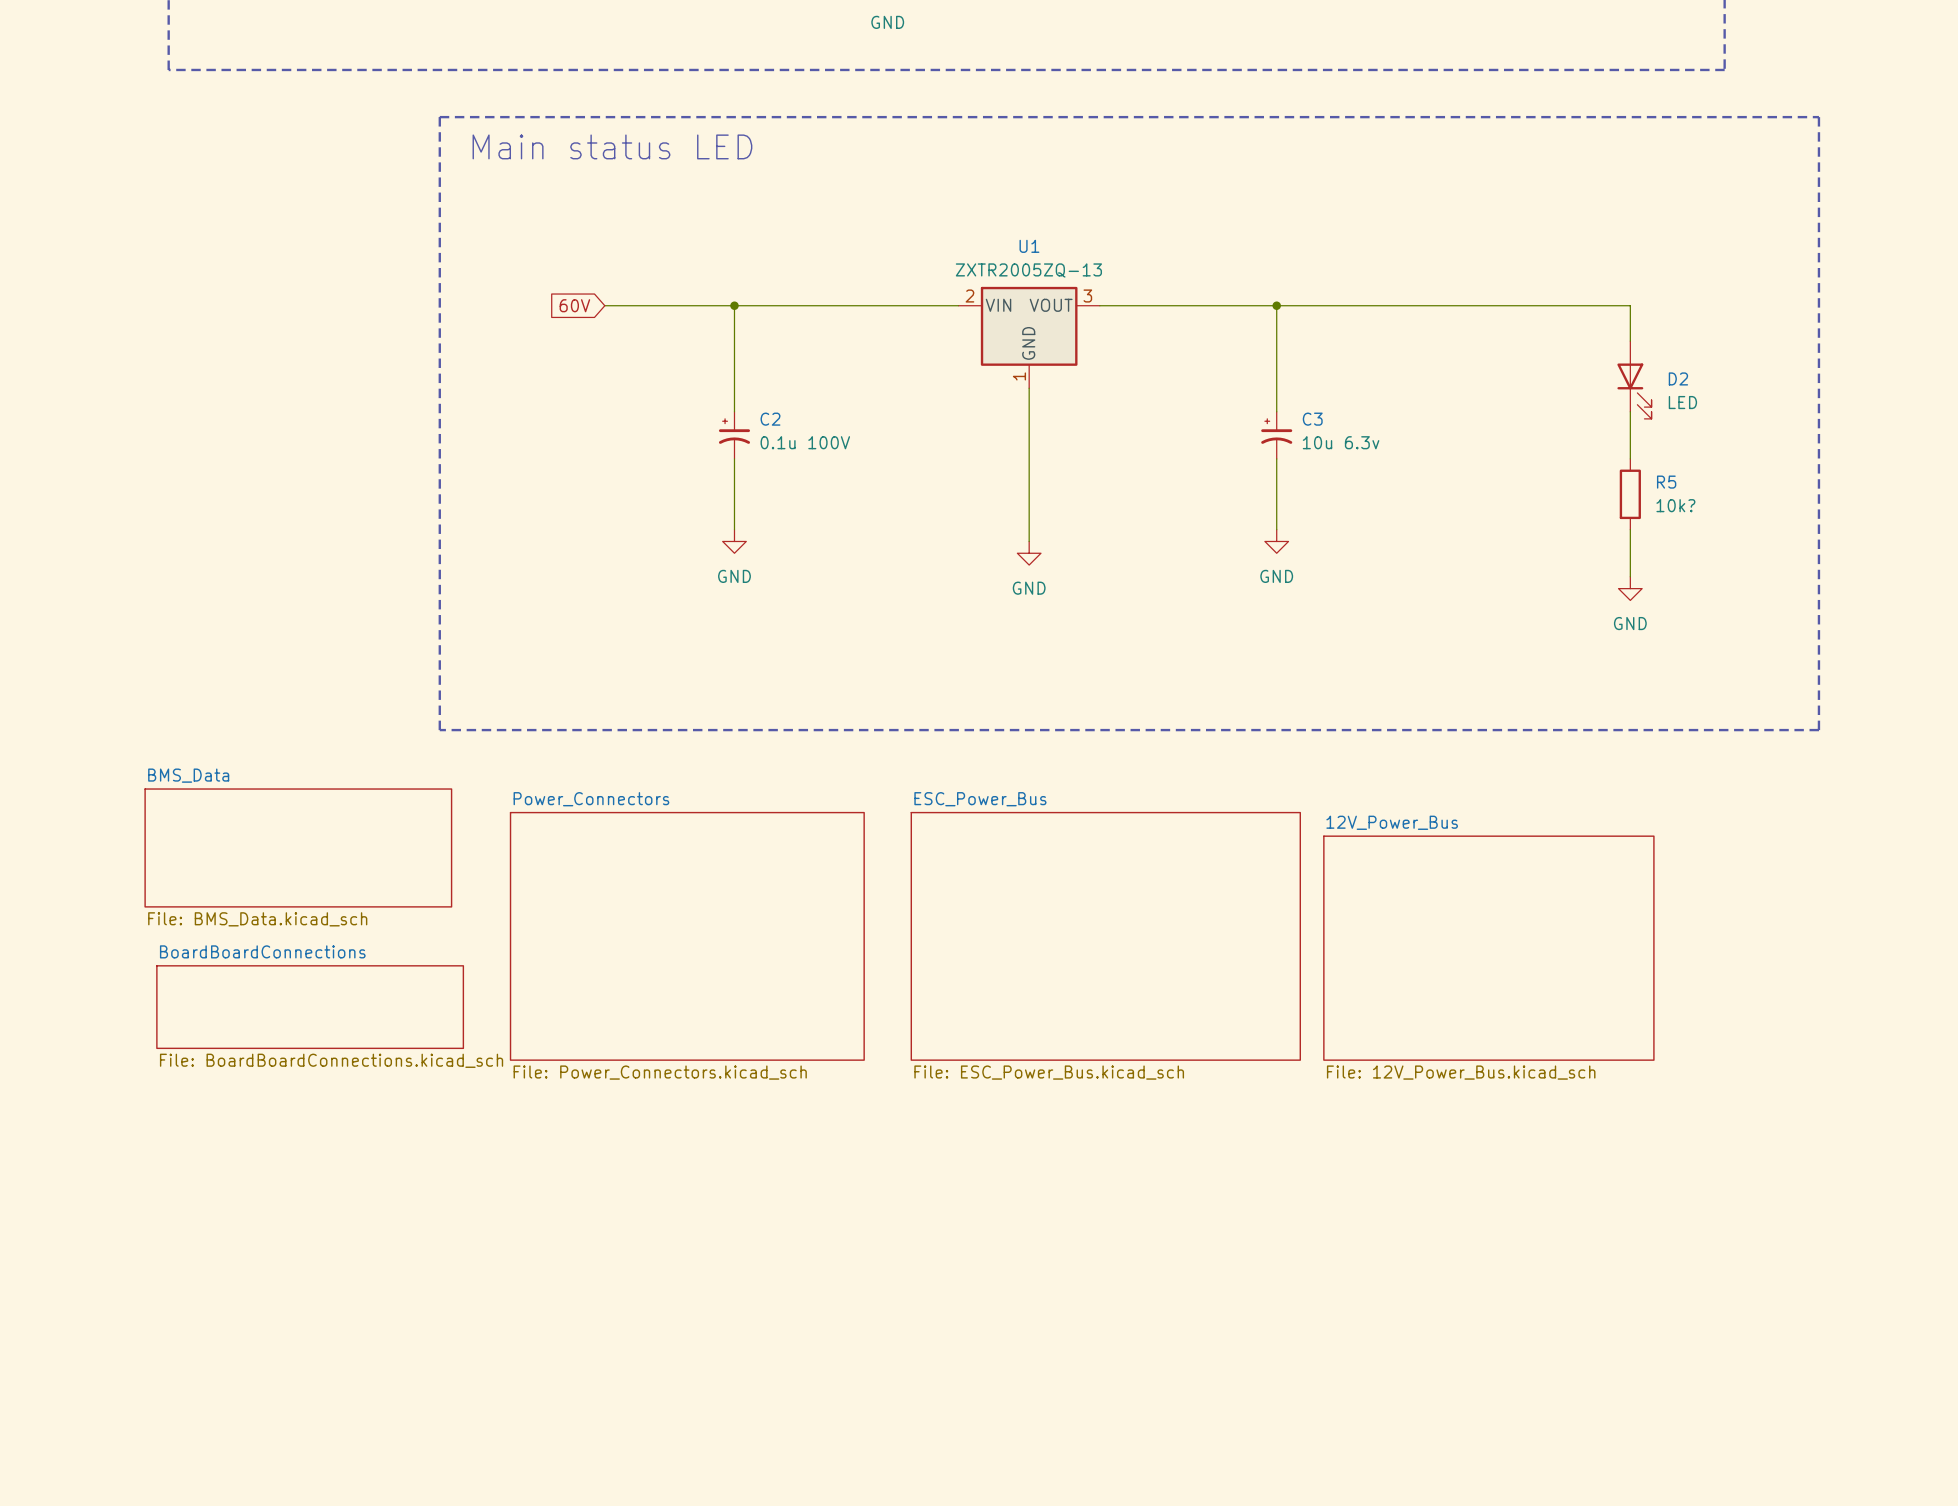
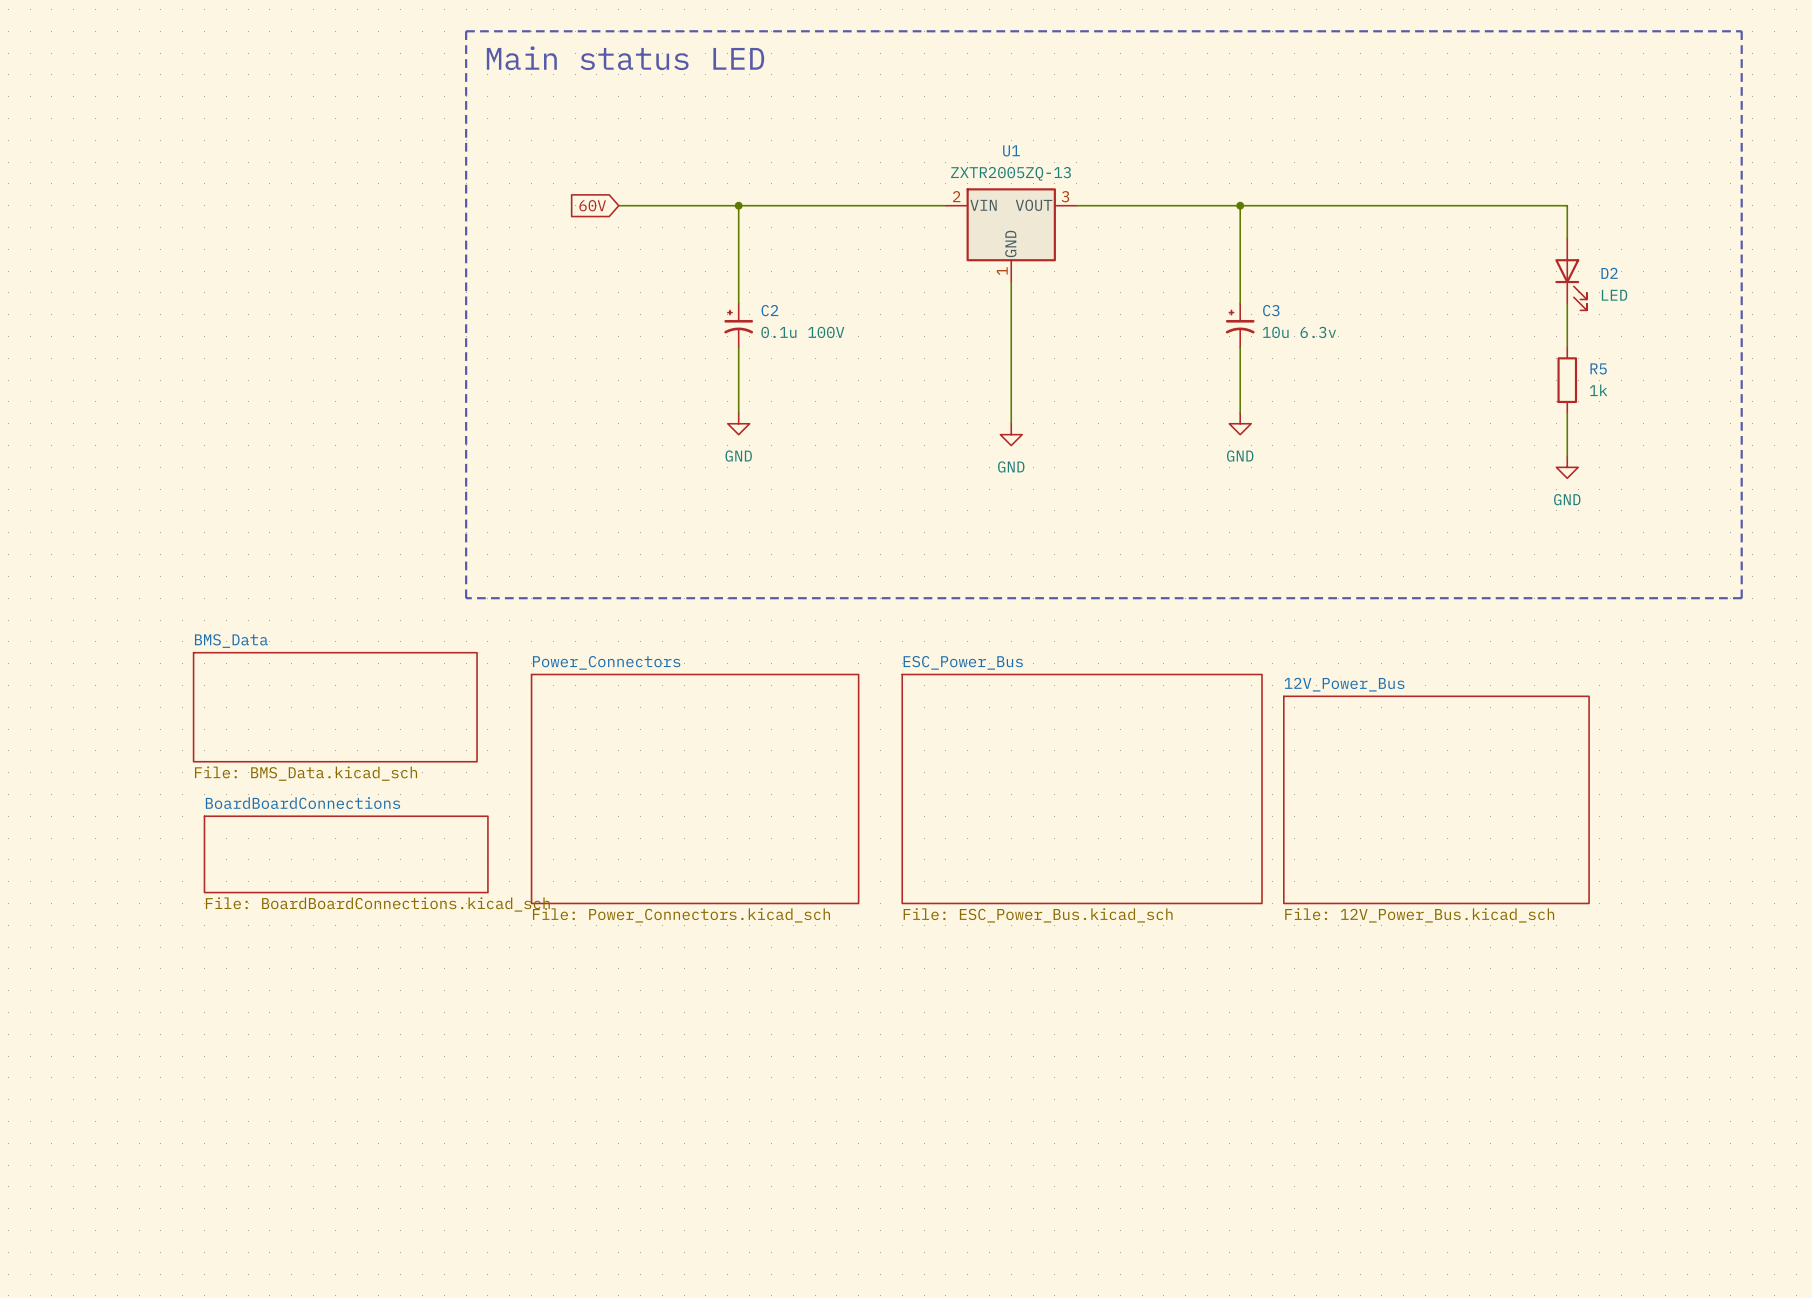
R5 value: 10k? (1675, 505) -> 1k (1598, 390)

